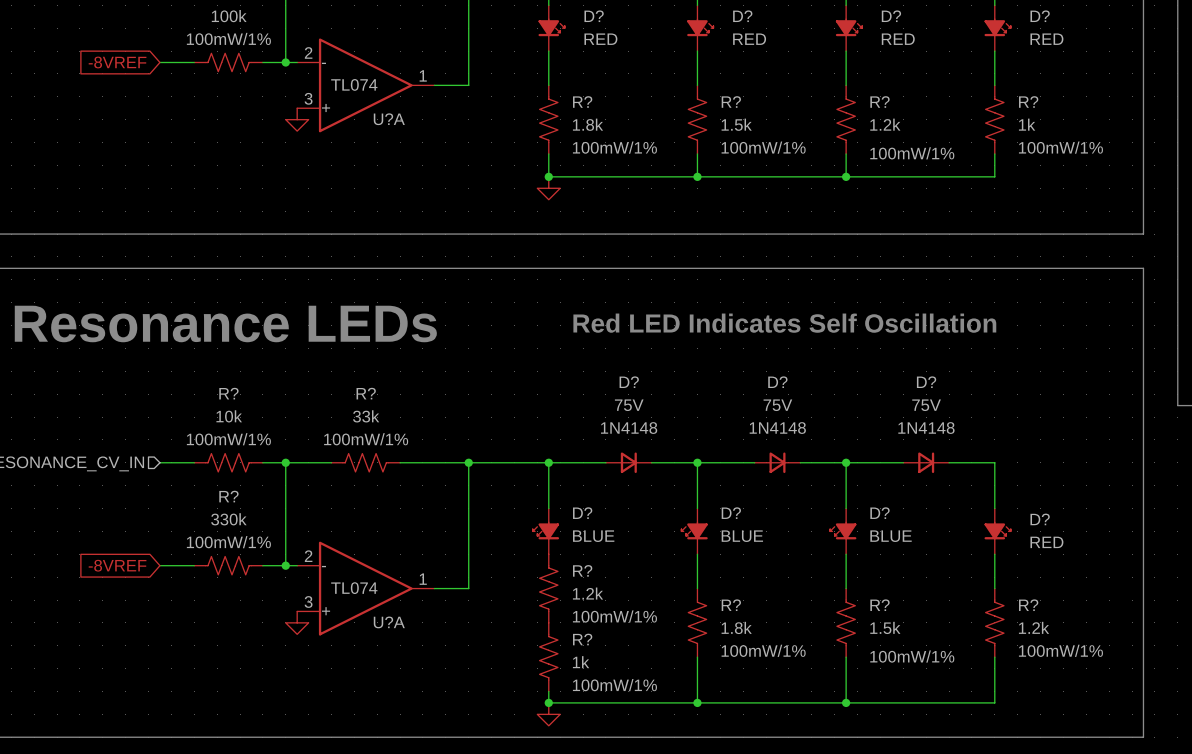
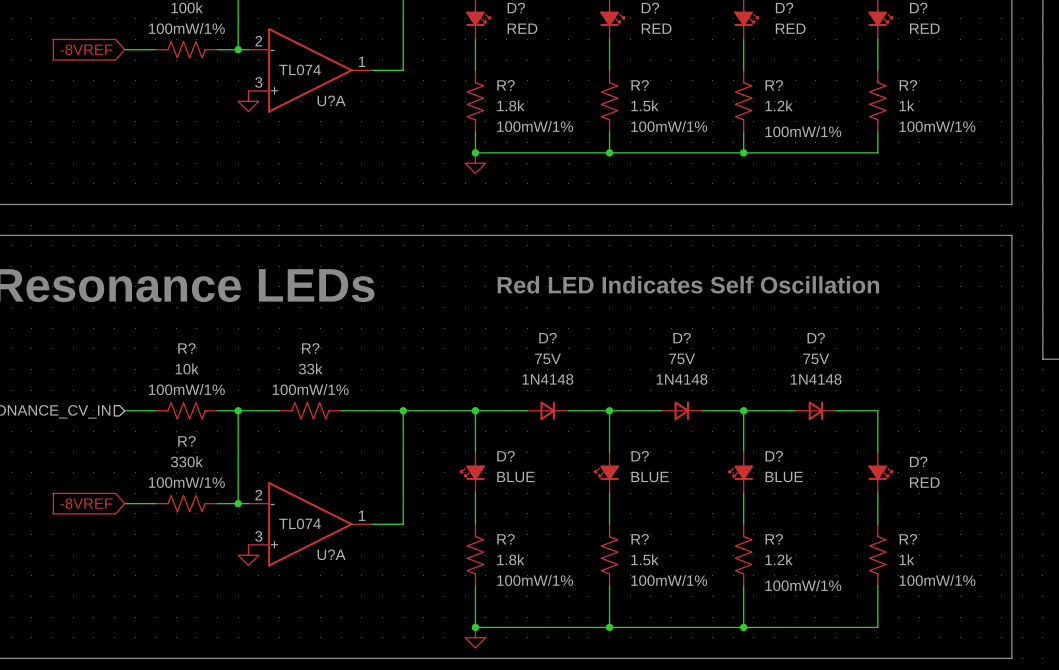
R?: 1.2k (548, 588) -> none
R?: none -> 1.8k (475, 555)
R? value: 1.8k (736, 627) -> 1.5k (644, 559)
R? value: 1.5k (885, 627) -> 1.2k (779, 559)
R? value: 1.2k (1034, 627) -> 1k (906, 559)
R?: 1k (548, 657) -> none

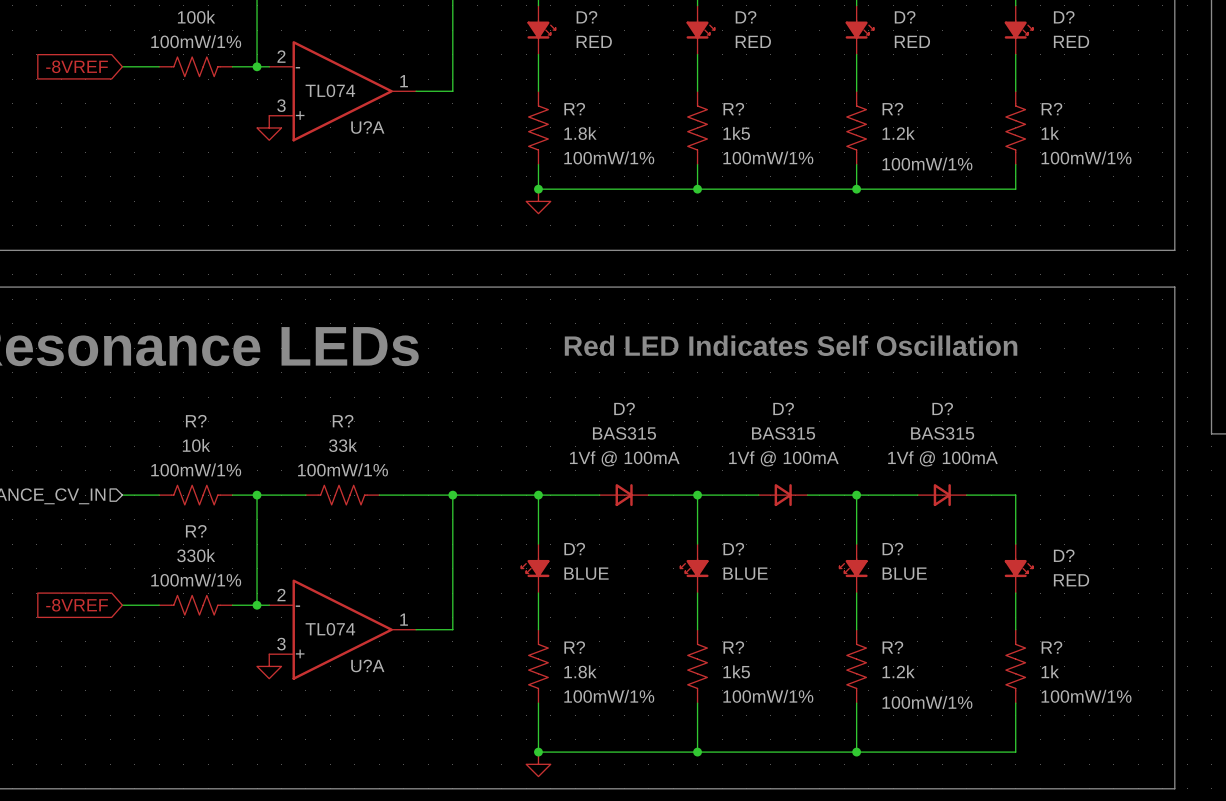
R? value: 1.5k (644, 105) -> 1k5 (736, 133)
D? value: 75V (548, 358) -> BAS315 (624, 433)
D? value: 75V (682, 358) -> BAS315 (783, 433)
D? value: 75V (816, 358) -> BAS315 (942, 433)
D? text: 1N4148 (547, 379) -> 1Vf @ 100mA (624, 458)
D? text: 1N4148 (682, 379) -> 1Vf @ 100mA (783, 458)
D? text: 1N4148 (816, 379) -> 1Vf @ 100mA (942, 458)
R? value: 1.5k (644, 559) -> 1k5 (736, 671)

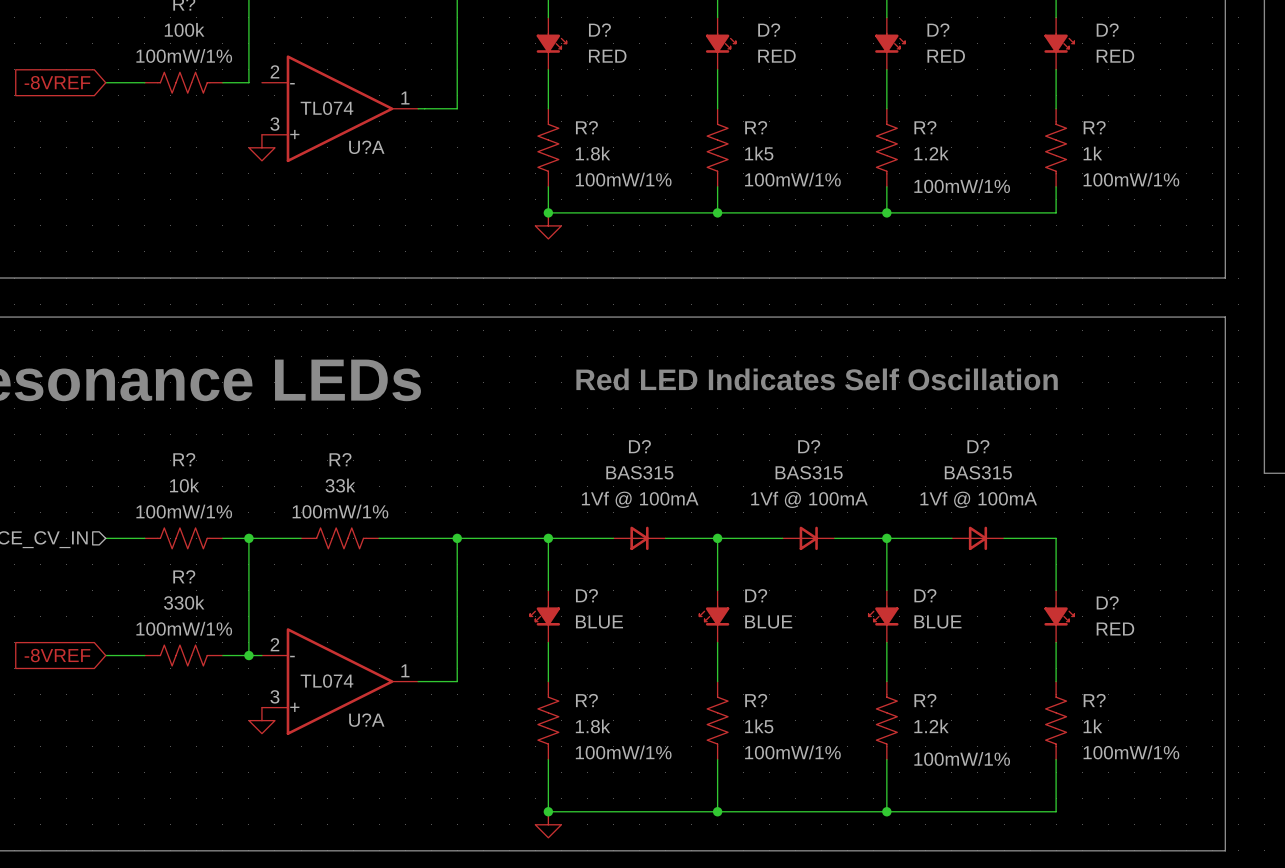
wire: (257, 66) (269, 66) -> none
junction: (257, 66) -> none

